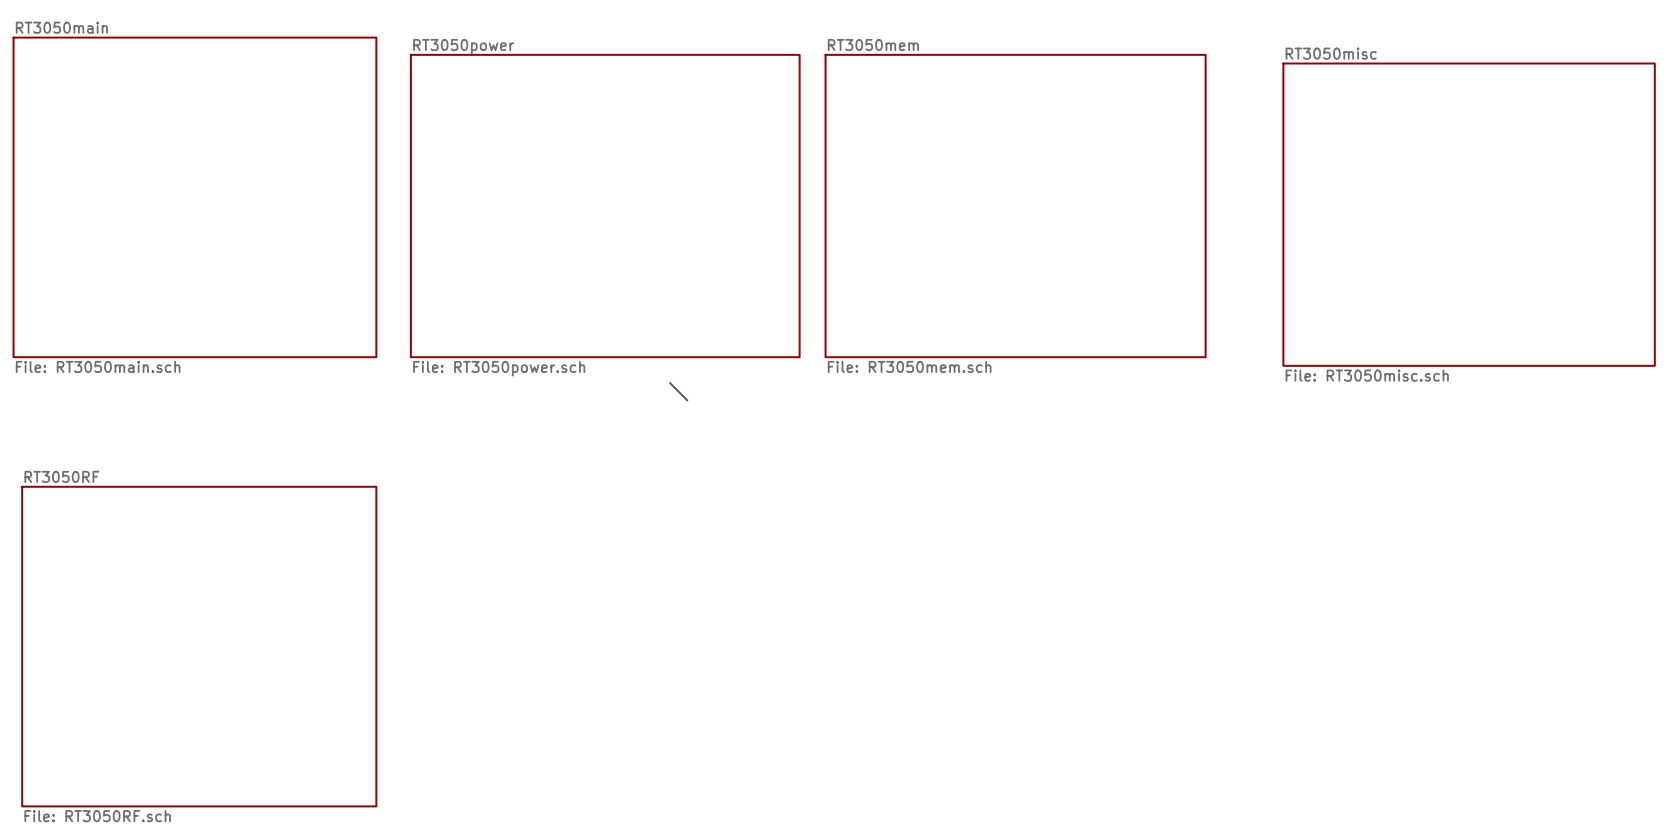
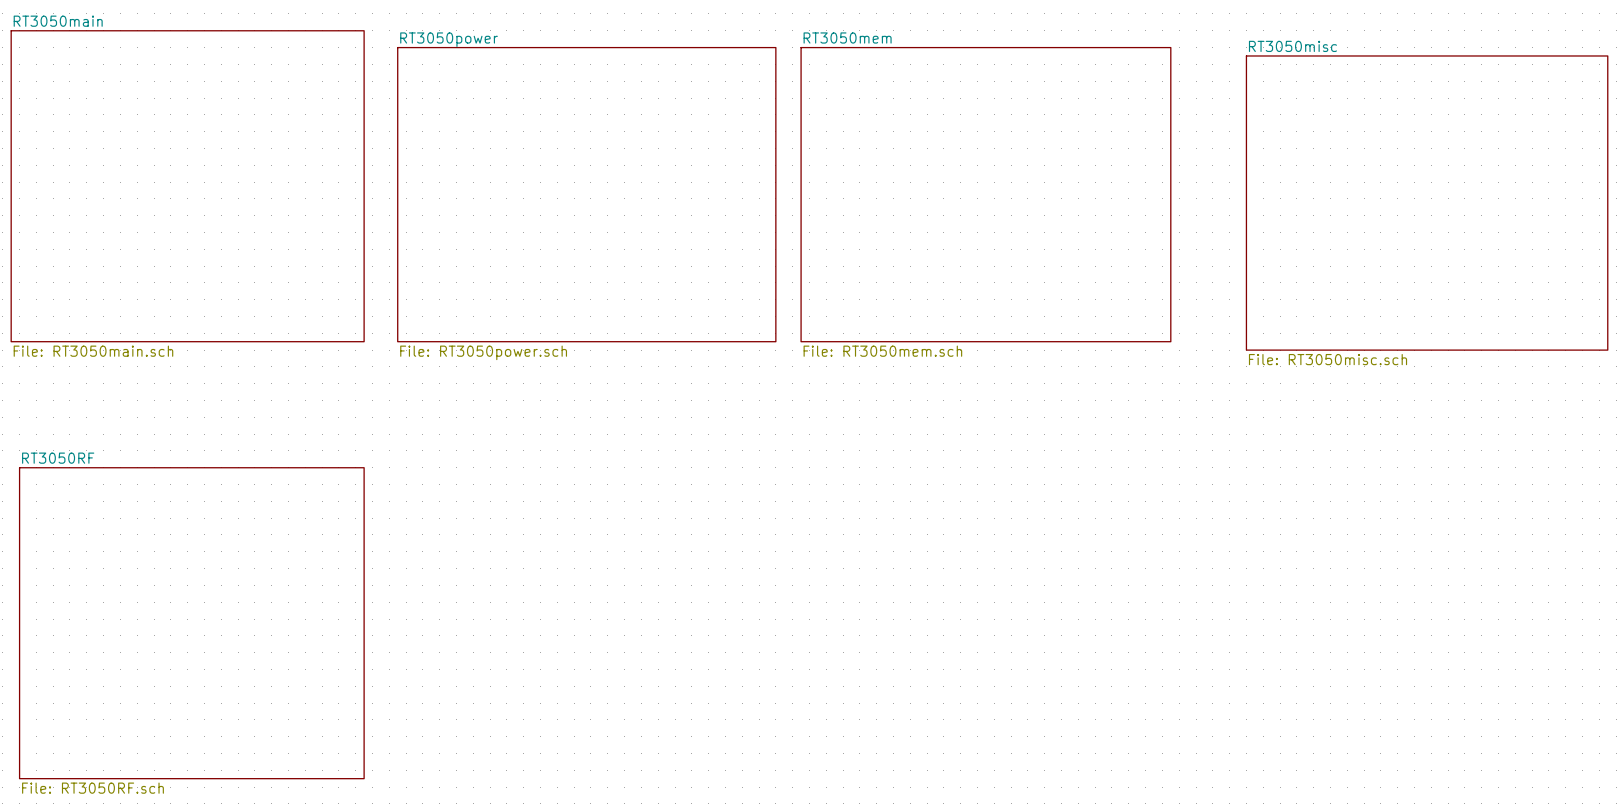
bus: (670, 383) (687, 400) -> none

